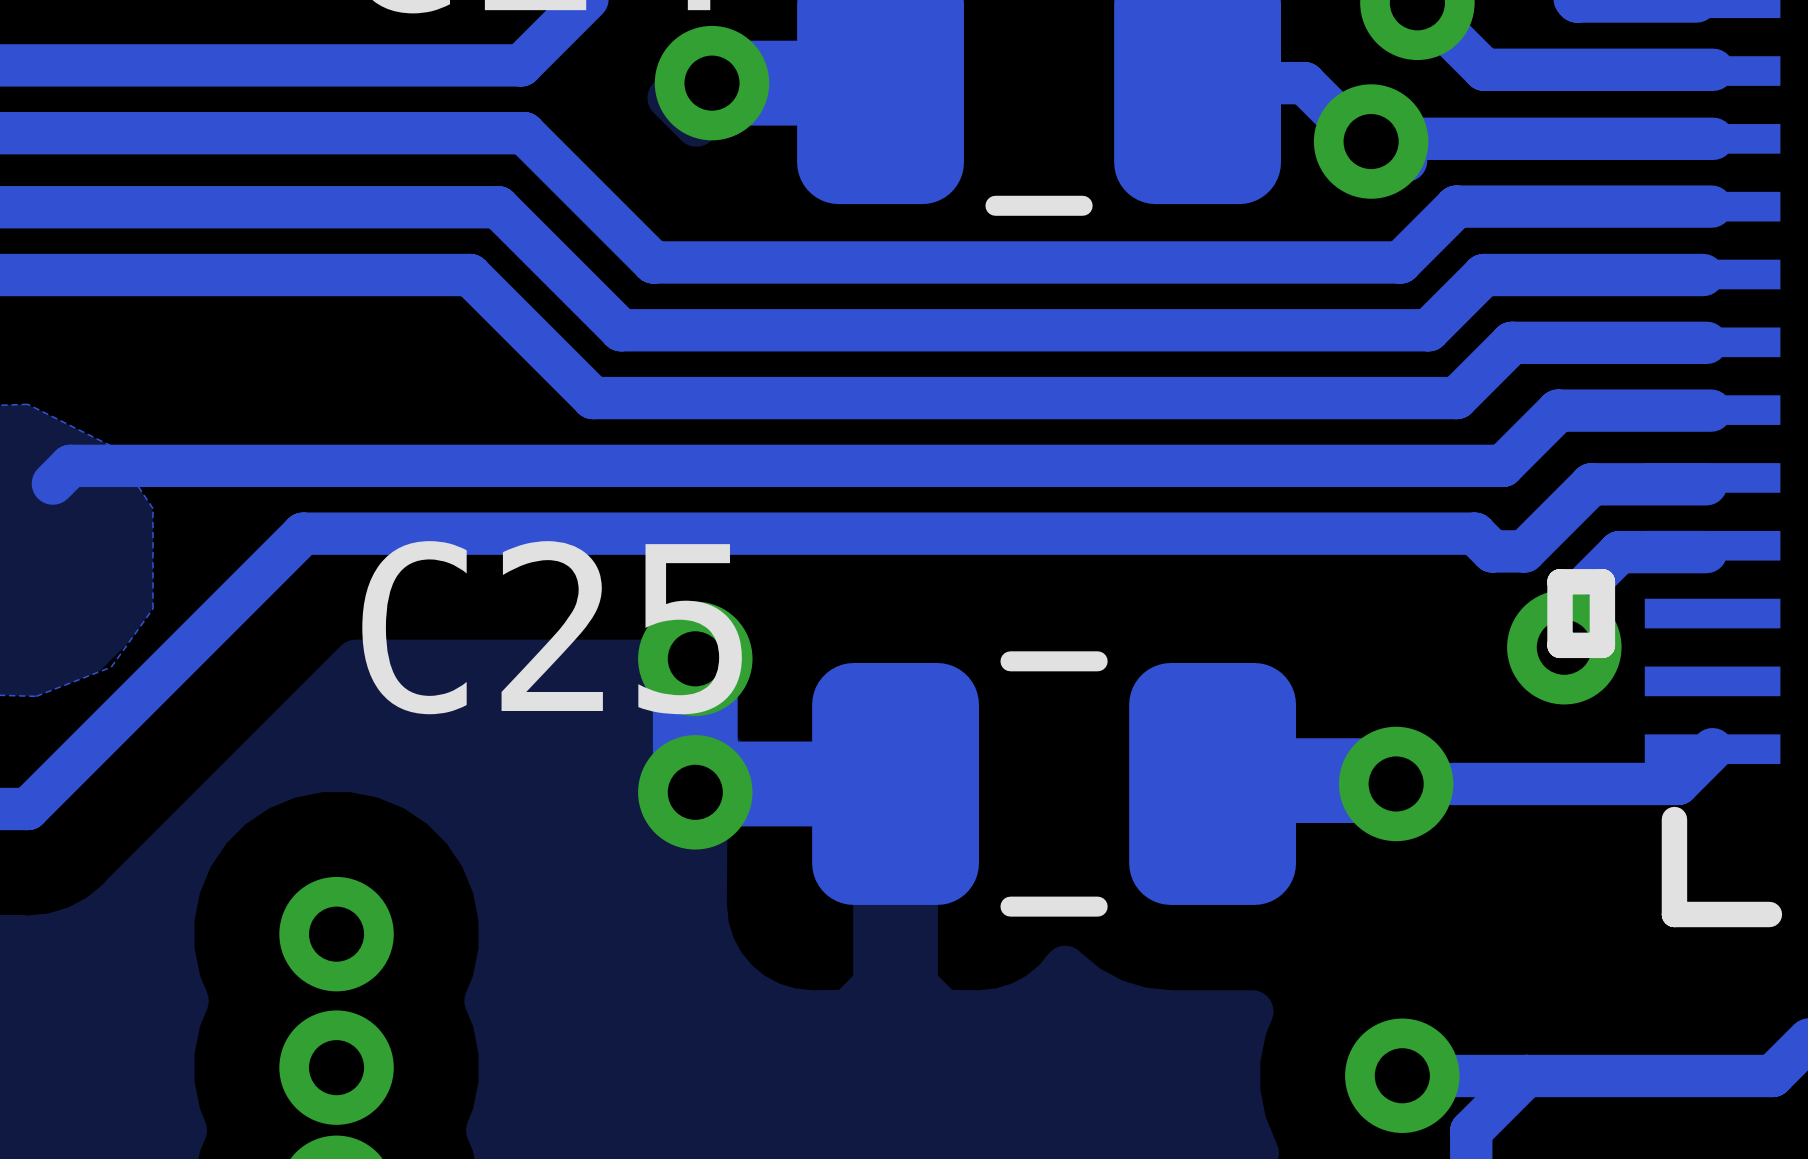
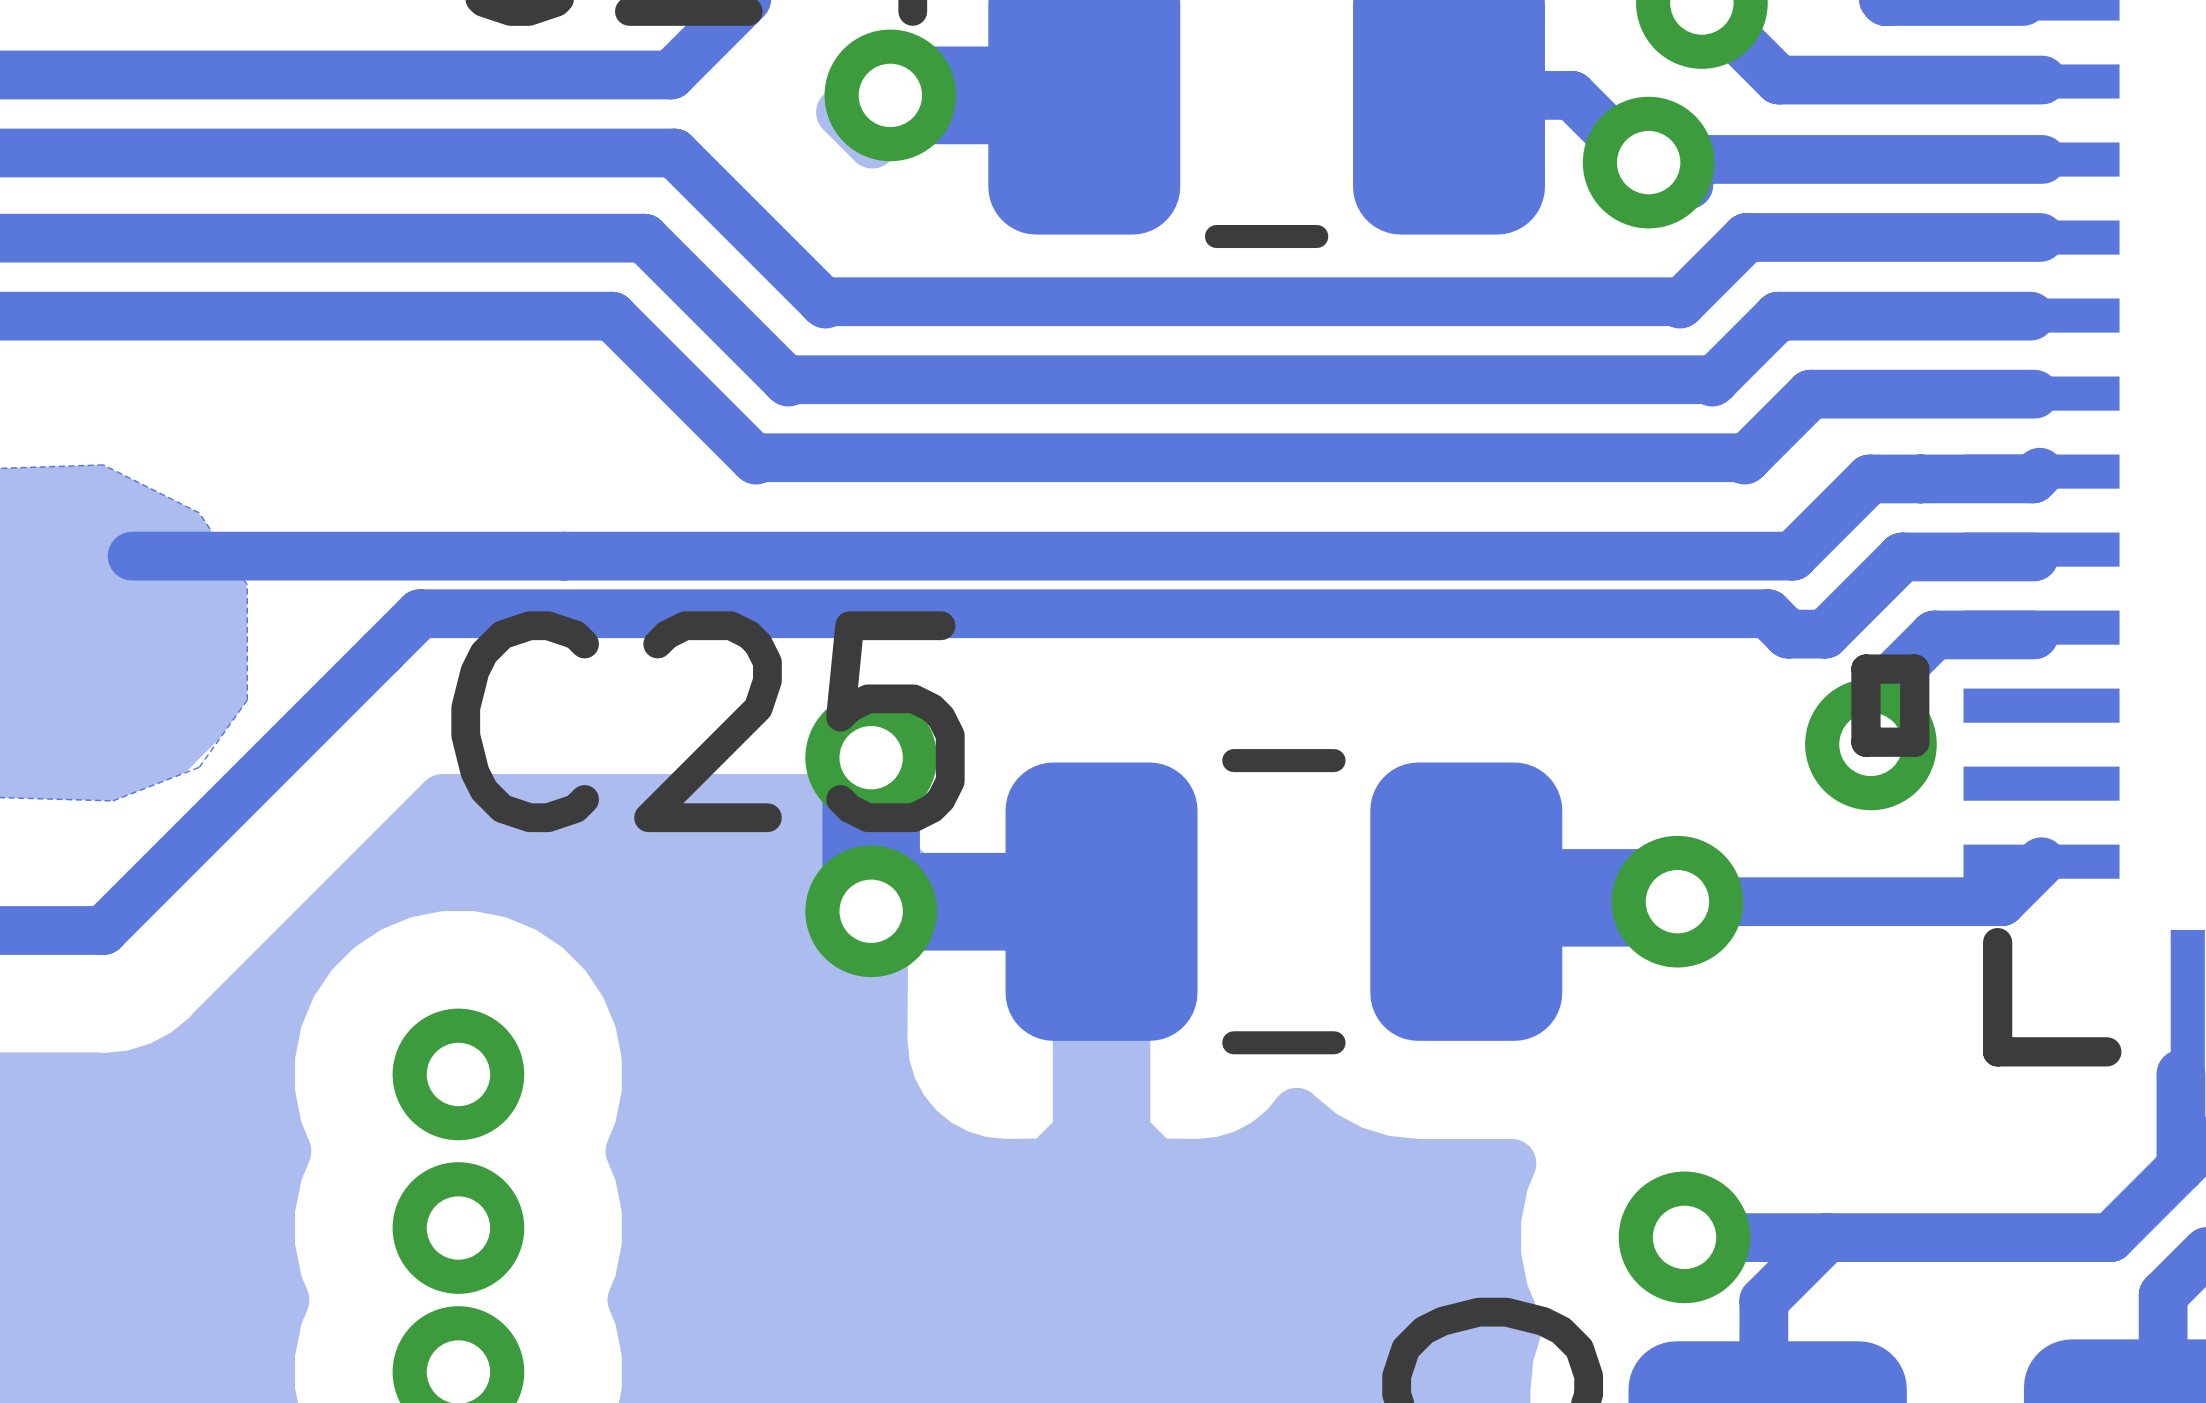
track: (1711, 410) (1558, 410) (1502, 465) (70, 465) (52, 483) -> (2039, 472) (2033, 478) (1869, 478) (1792, 556) (132, 556)

